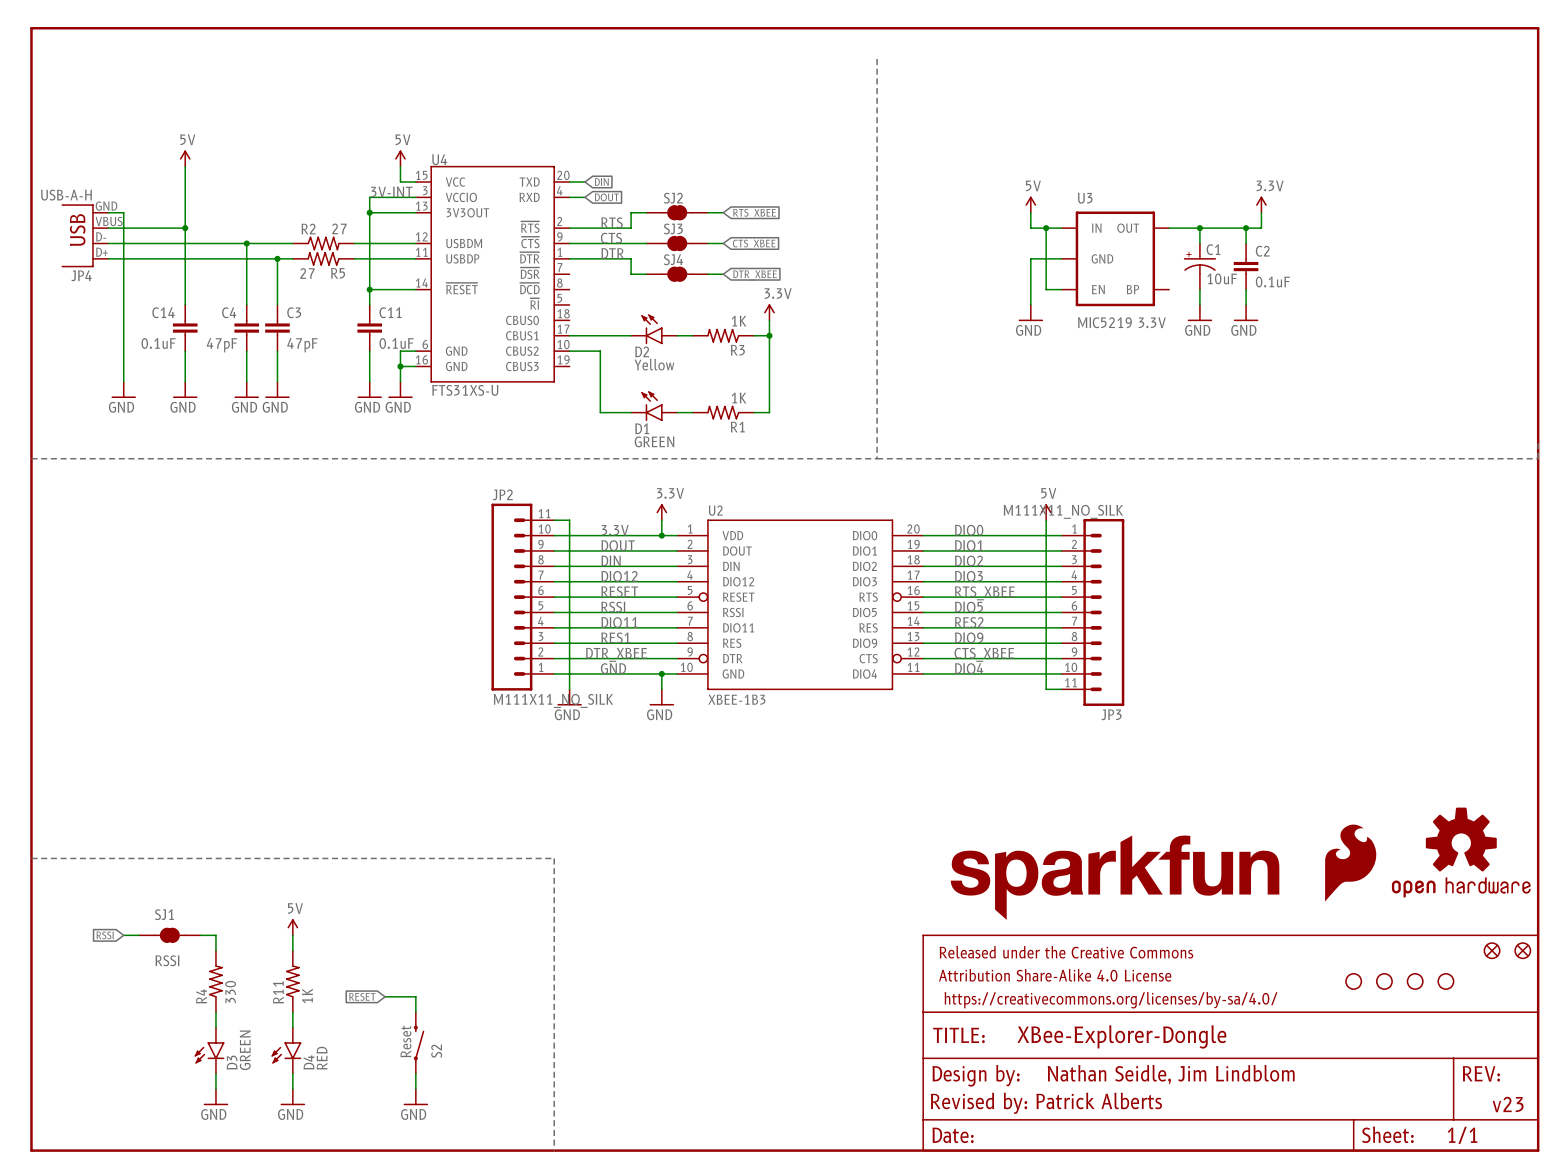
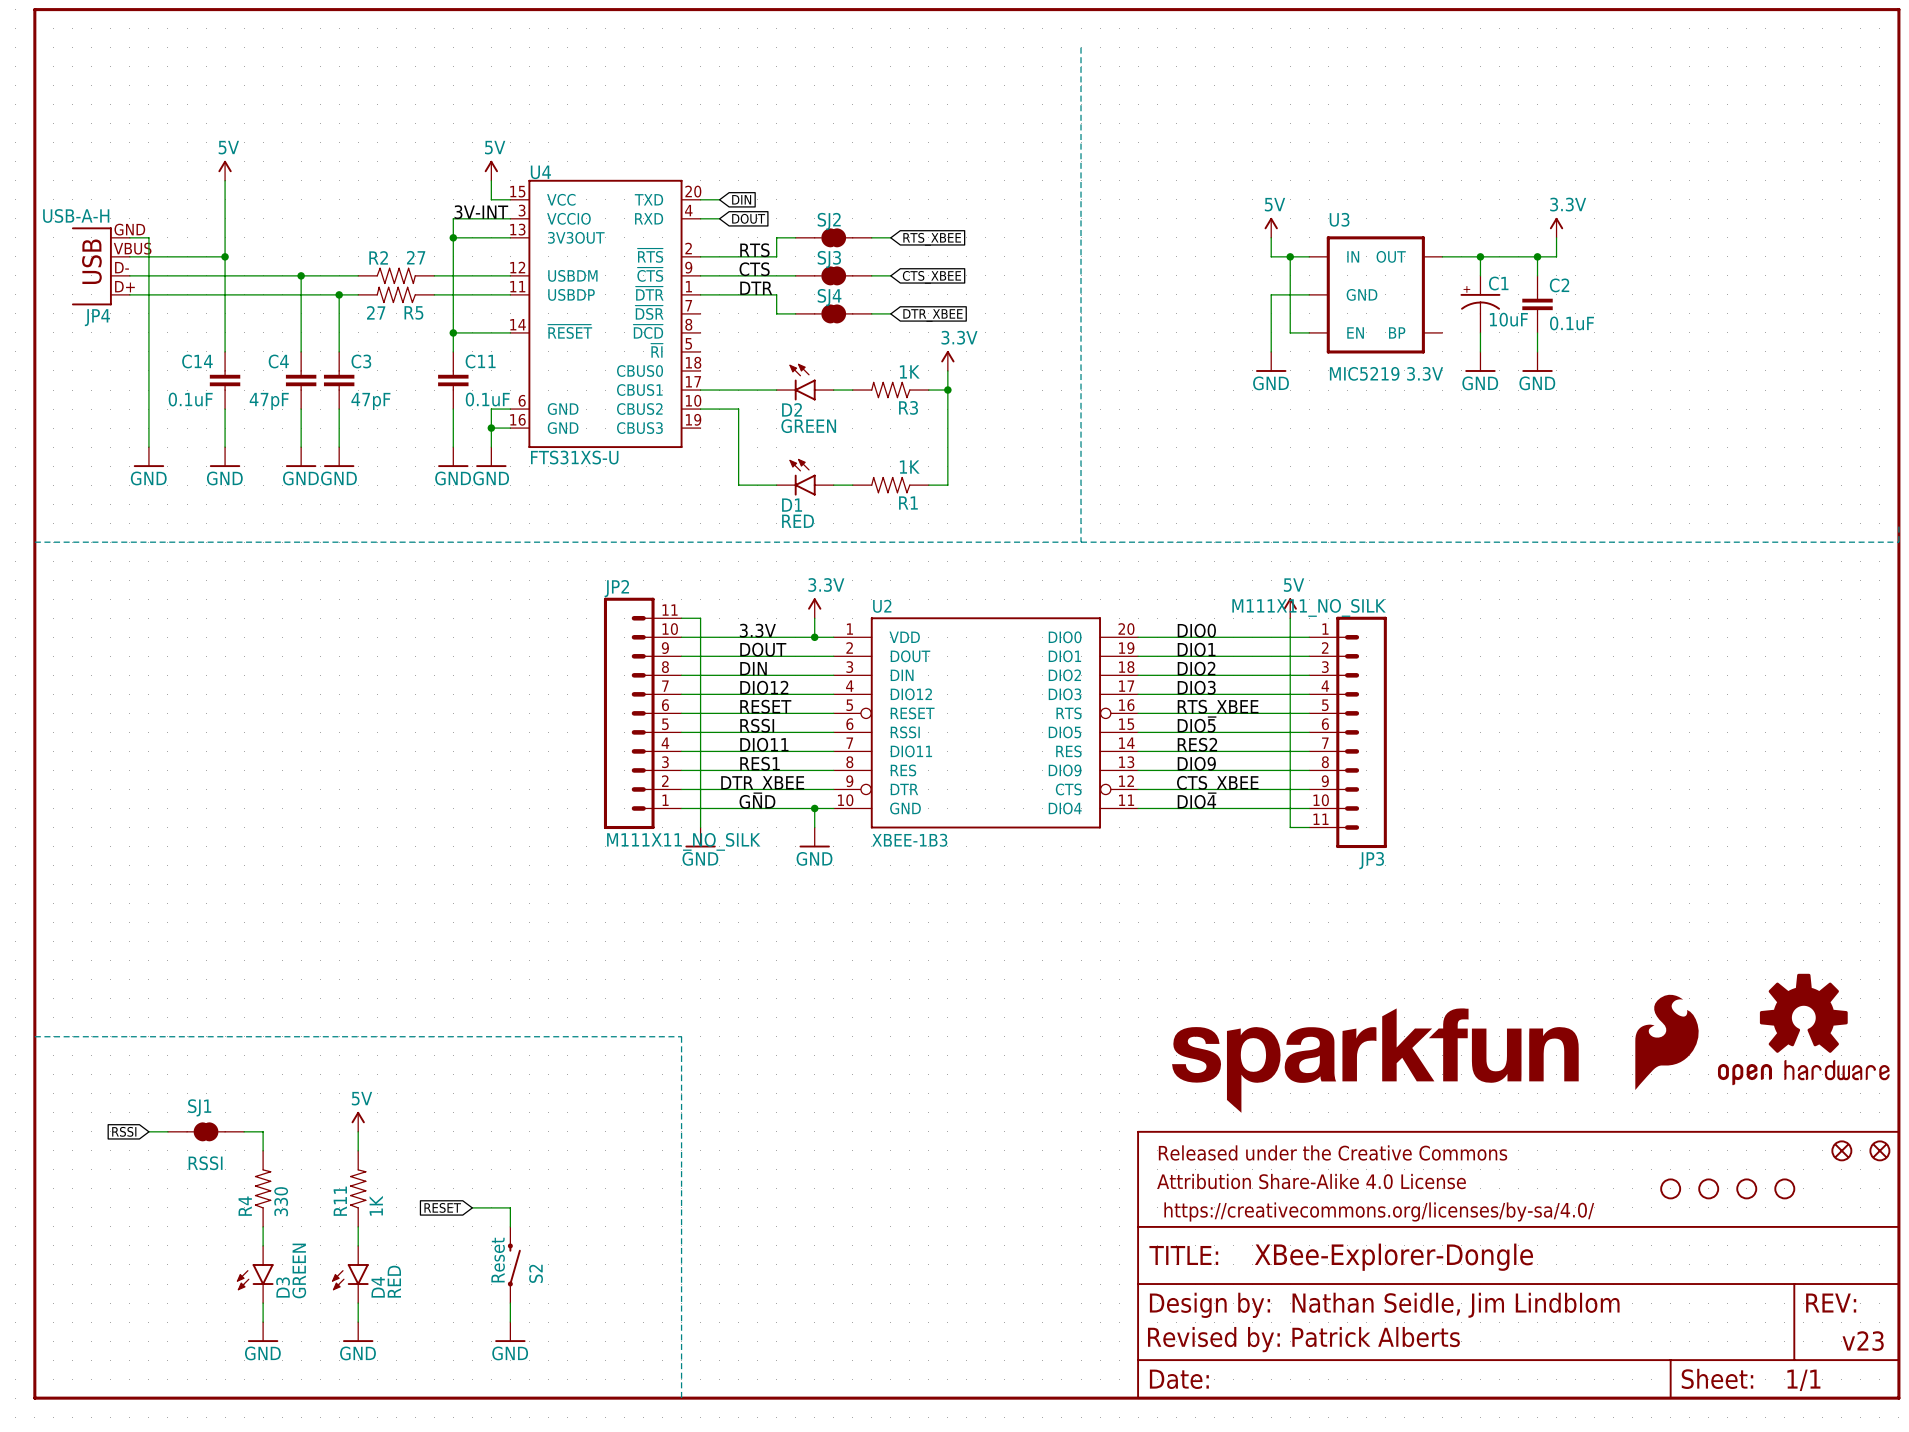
D2 value: Yellow (654, 364) -> GREEN (808, 426)
D1 value: GREEN (654, 441) -> RED (798, 521)

